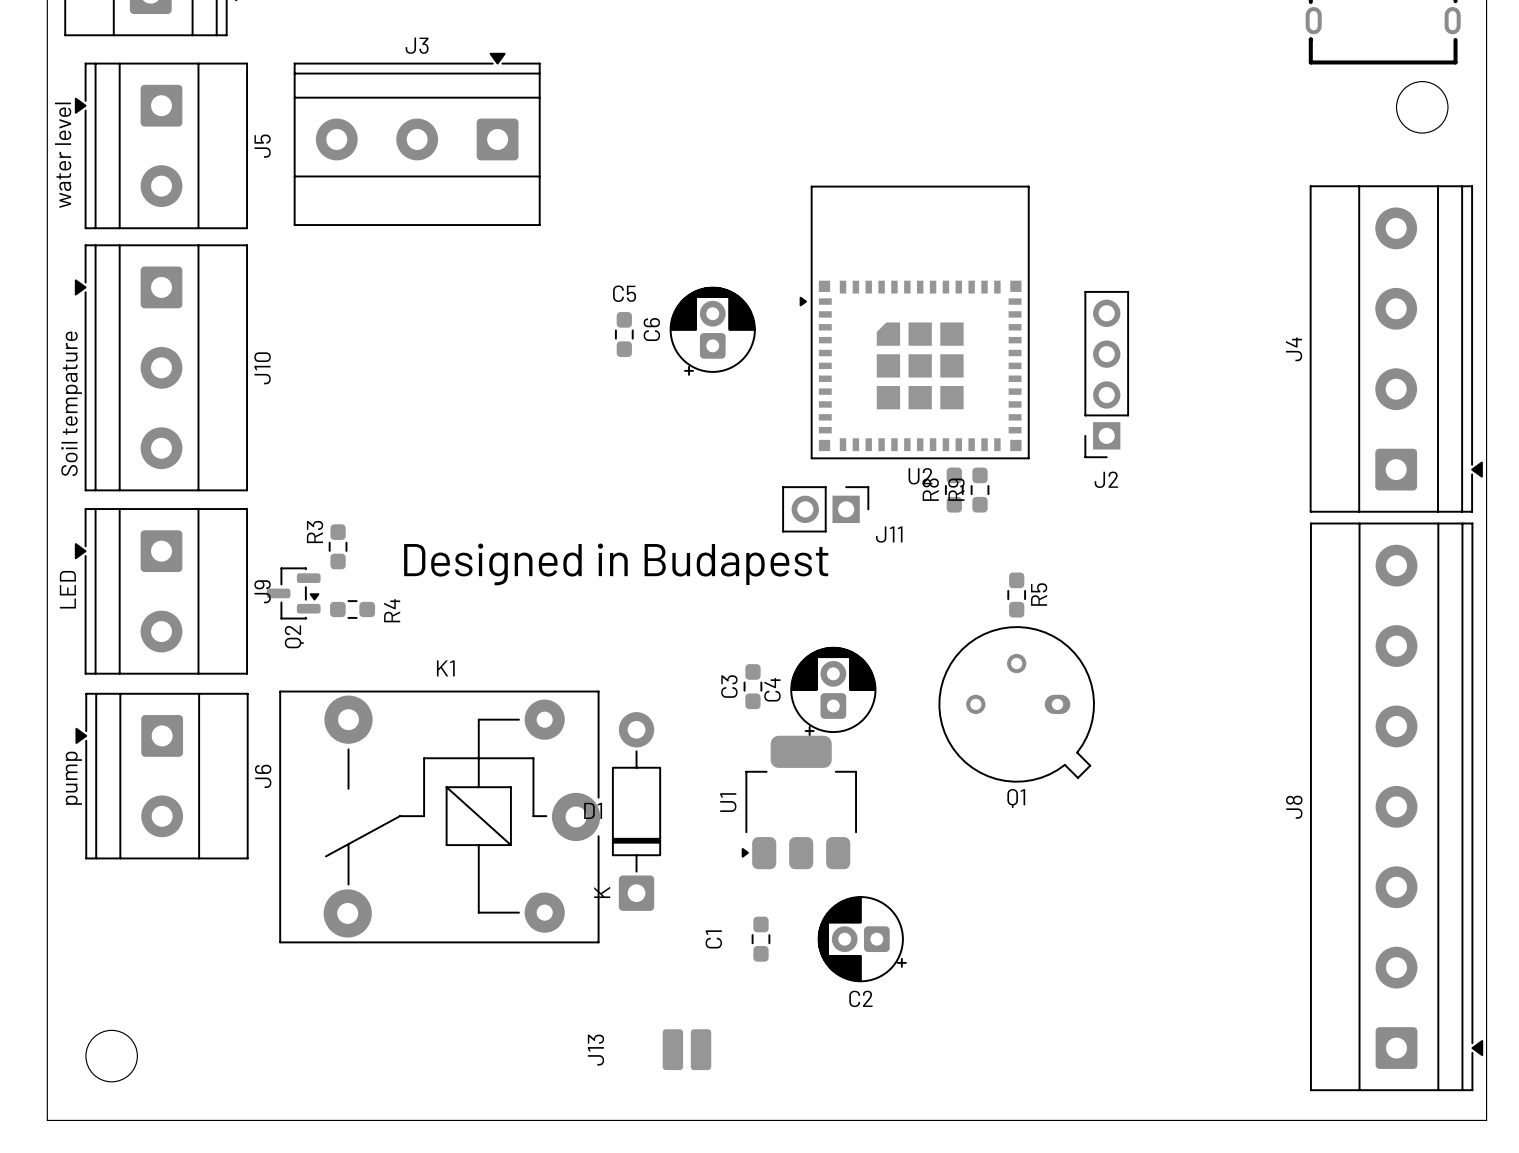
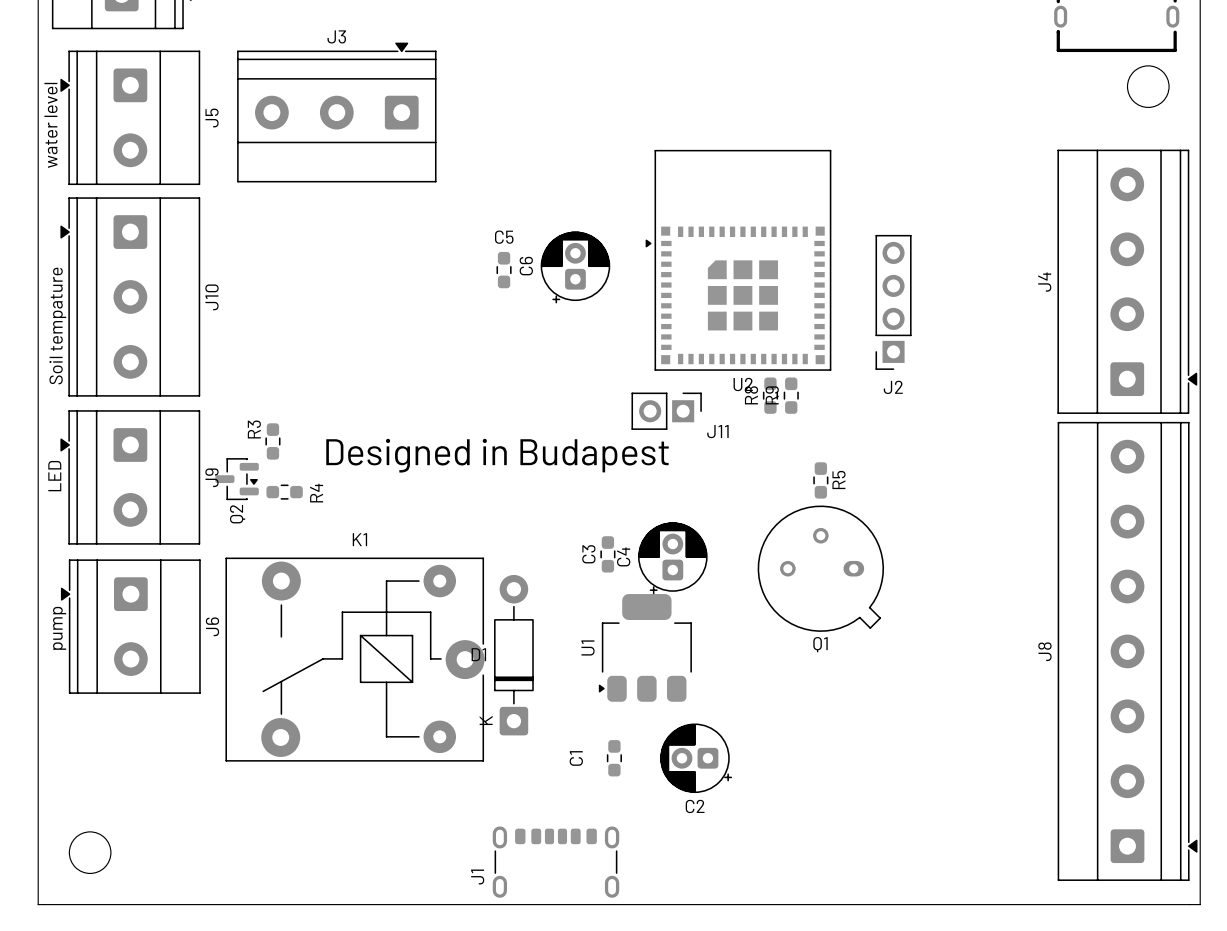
J13: (686, 1049) -> none
J1: none -> (555, 862)

